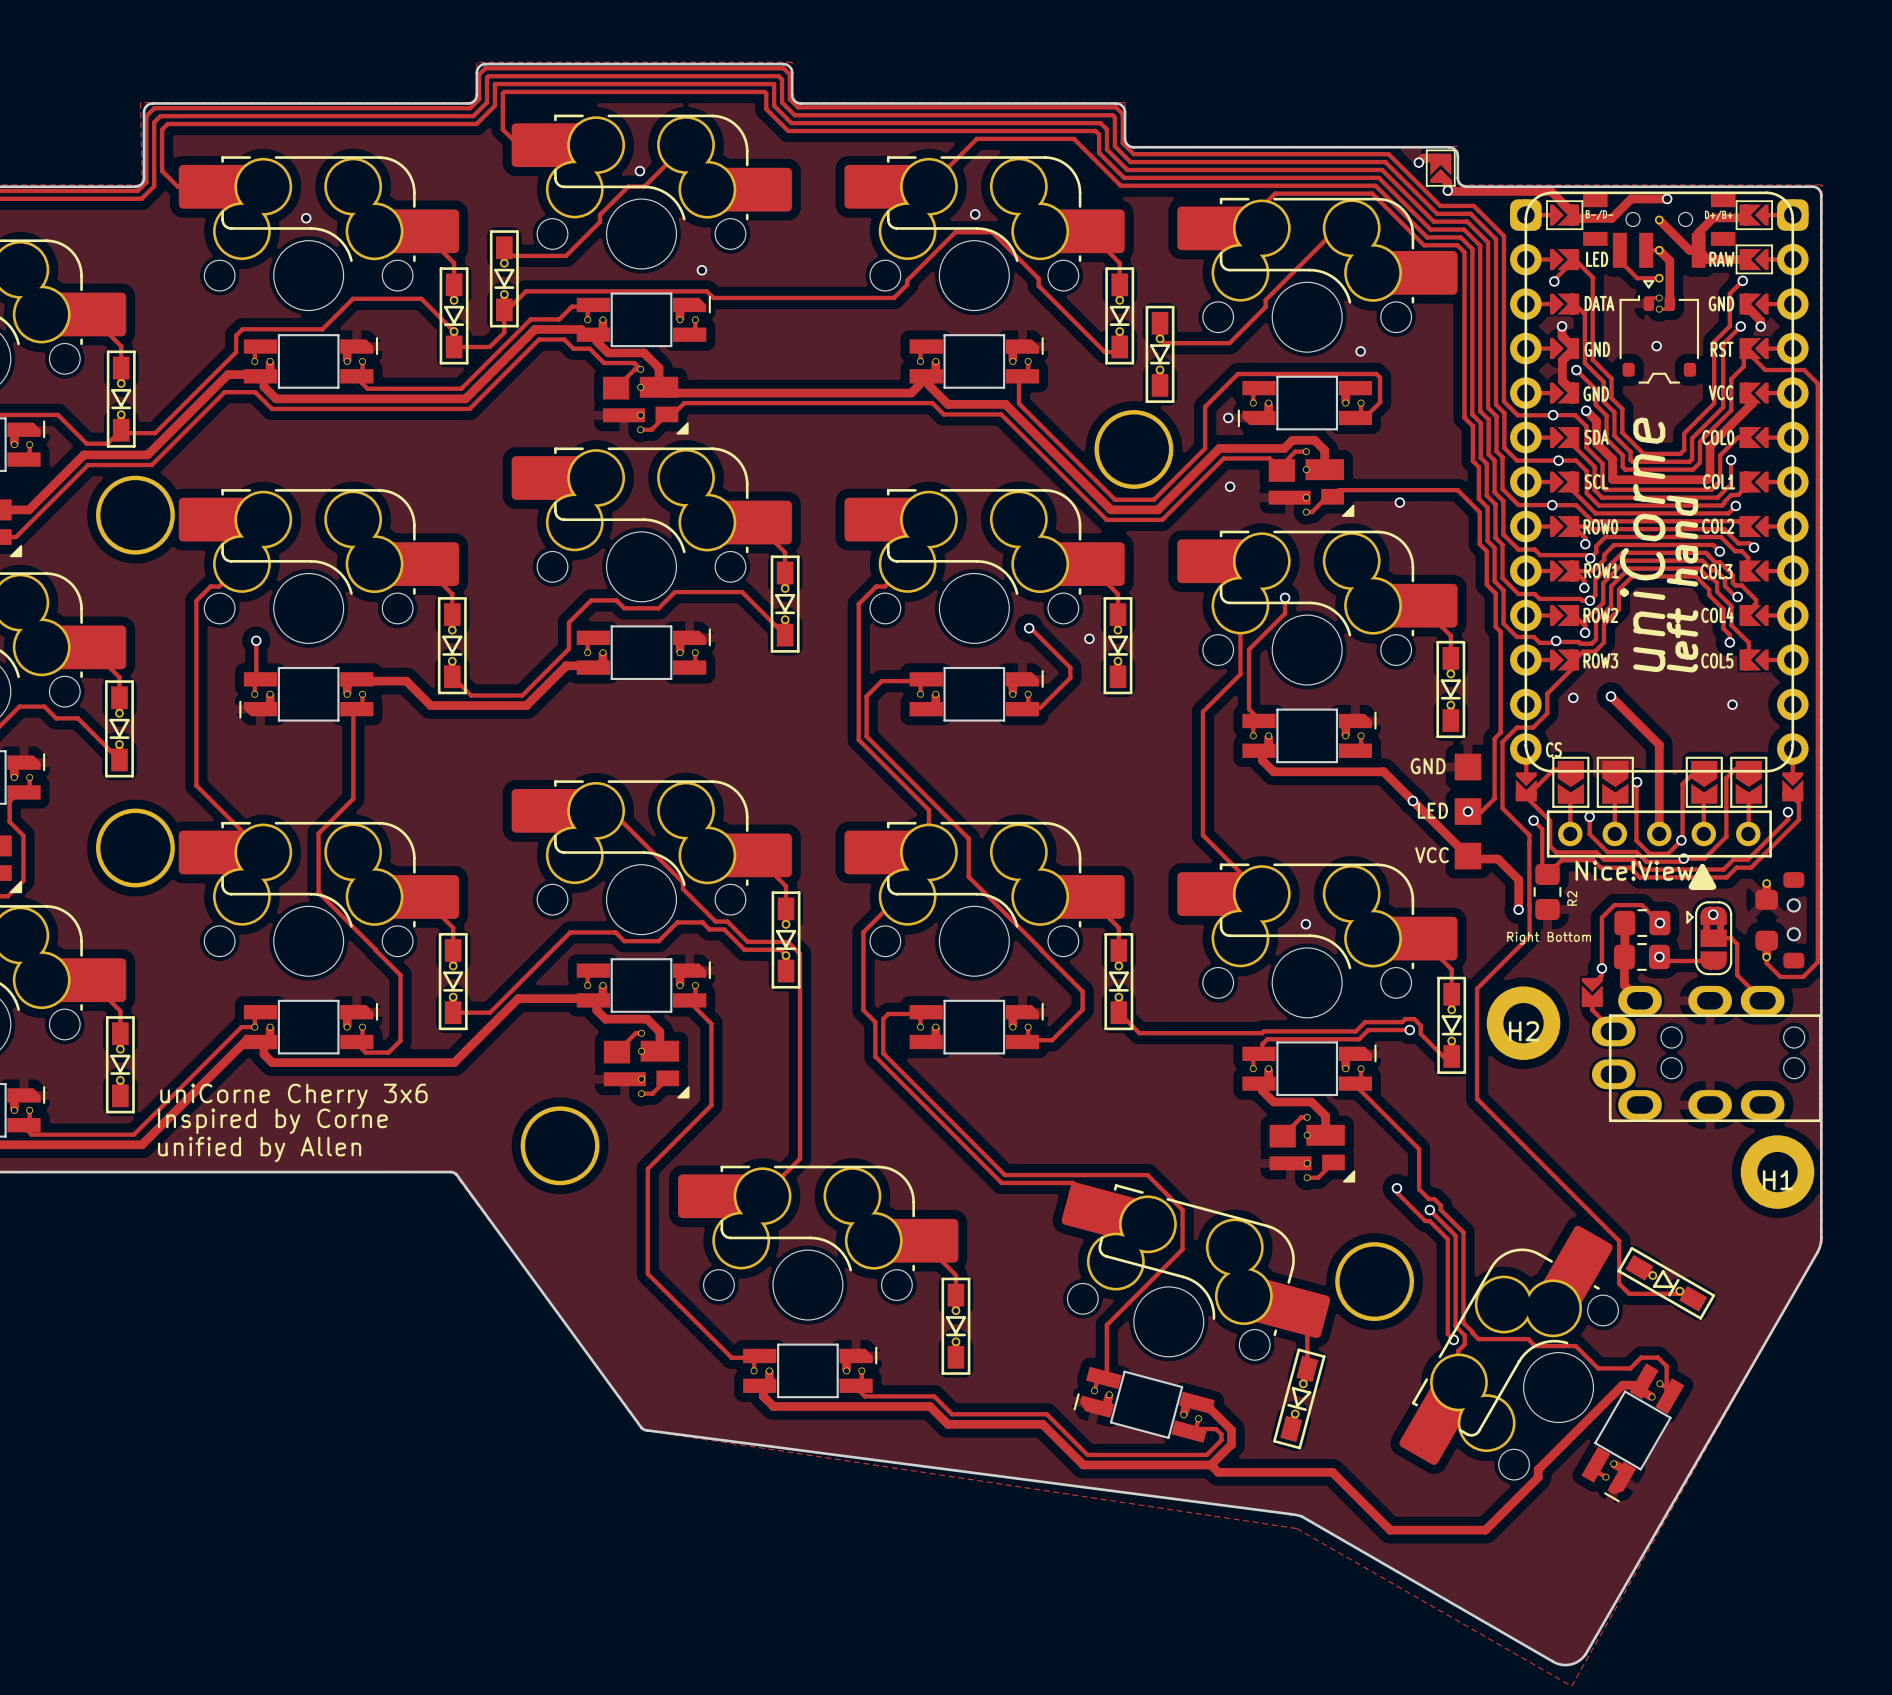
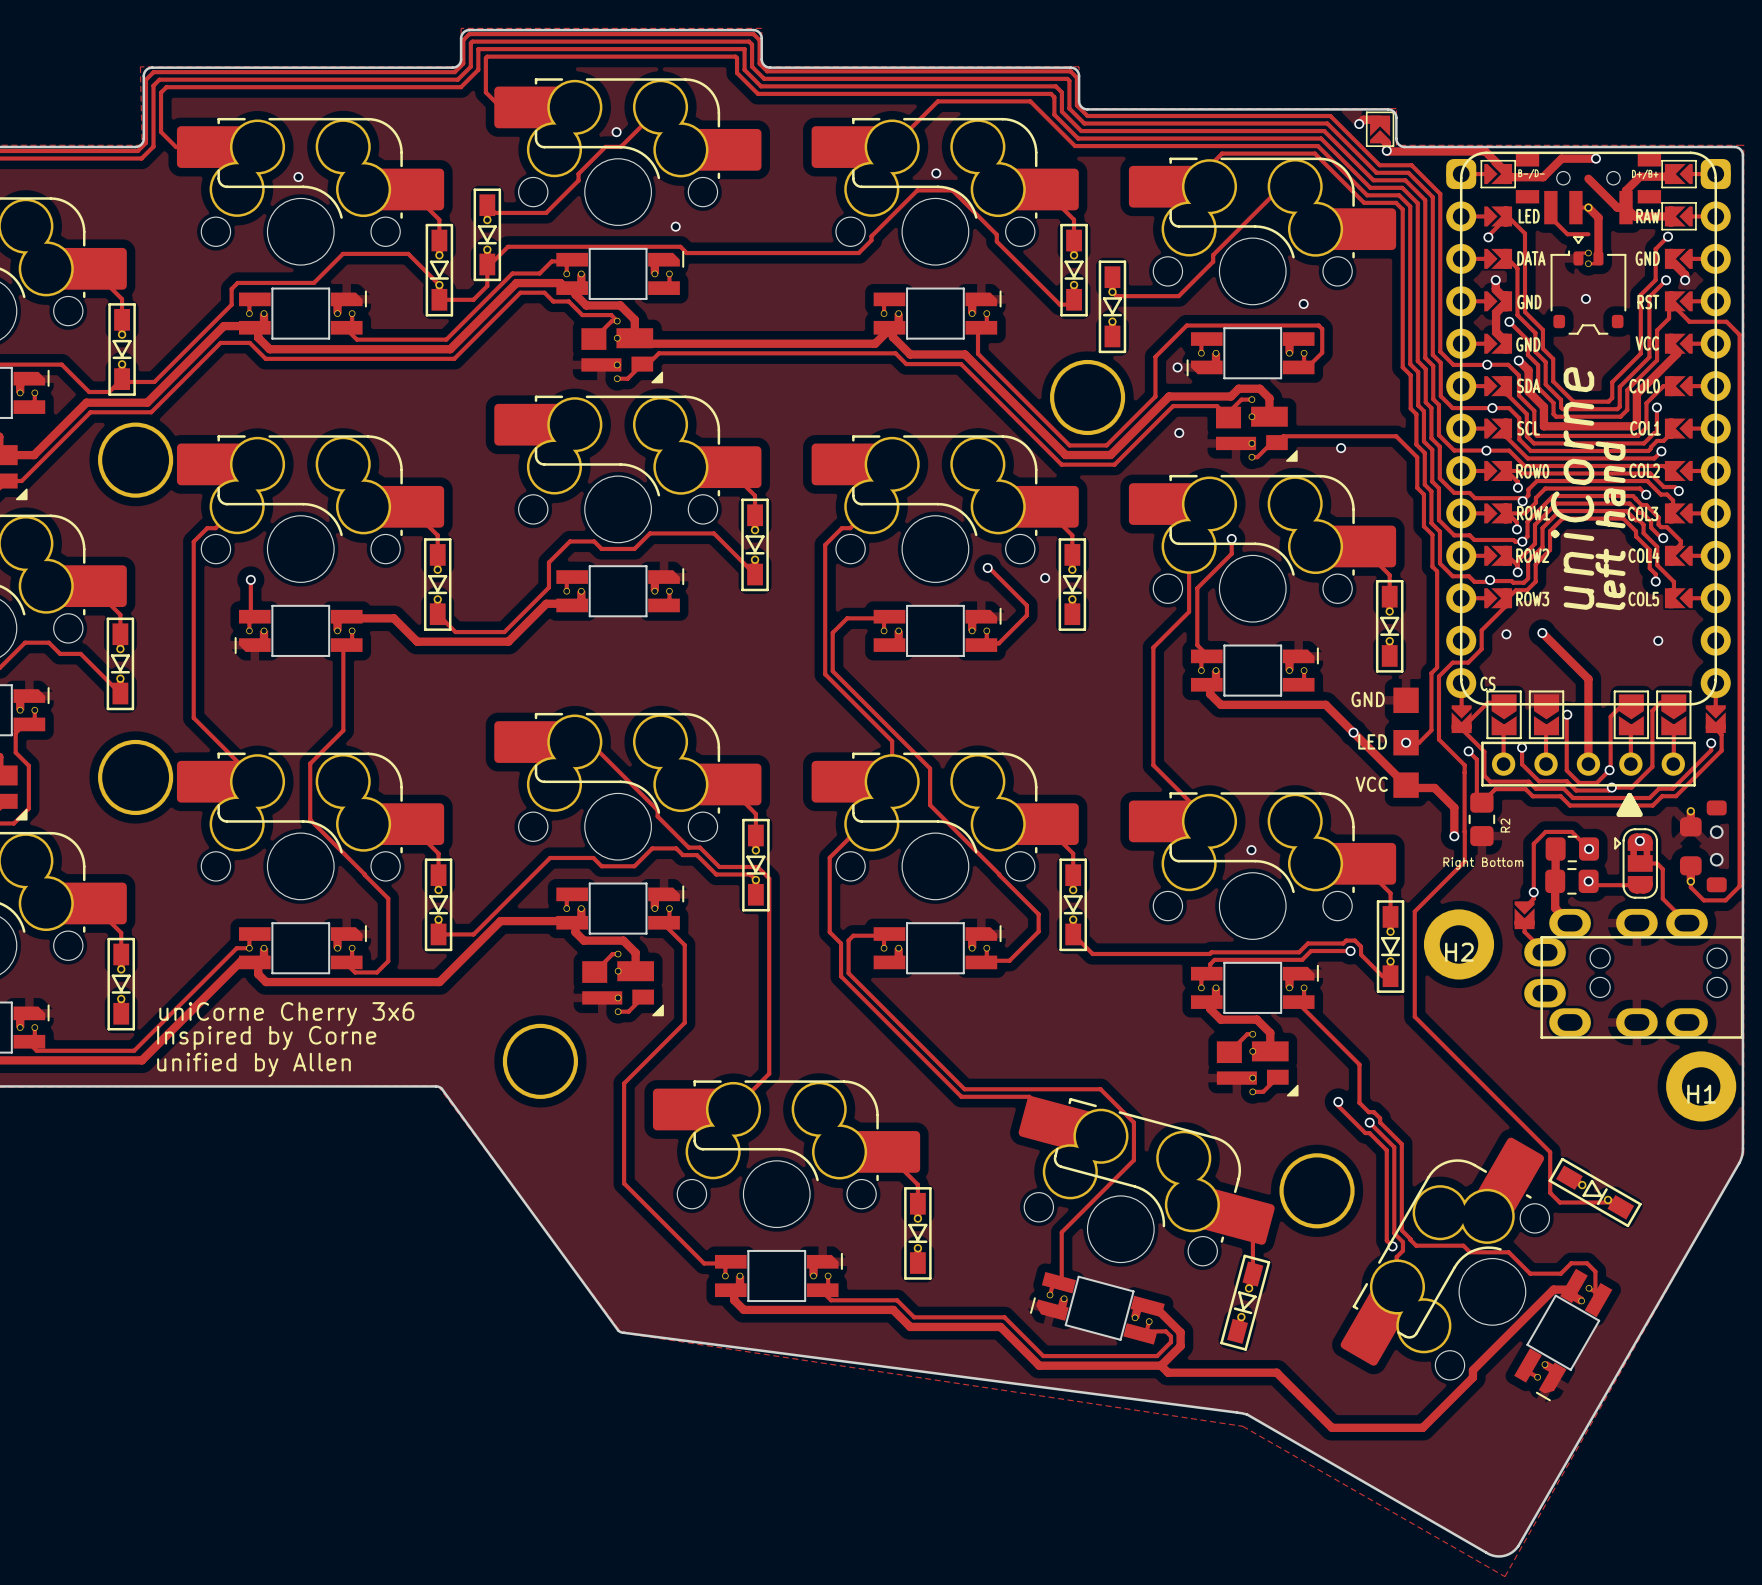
part footprint: [1583, 193, 1736, 283] -> [1515, 153, 1662, 225]
part text: Nice!View (1634, 870) -> none

